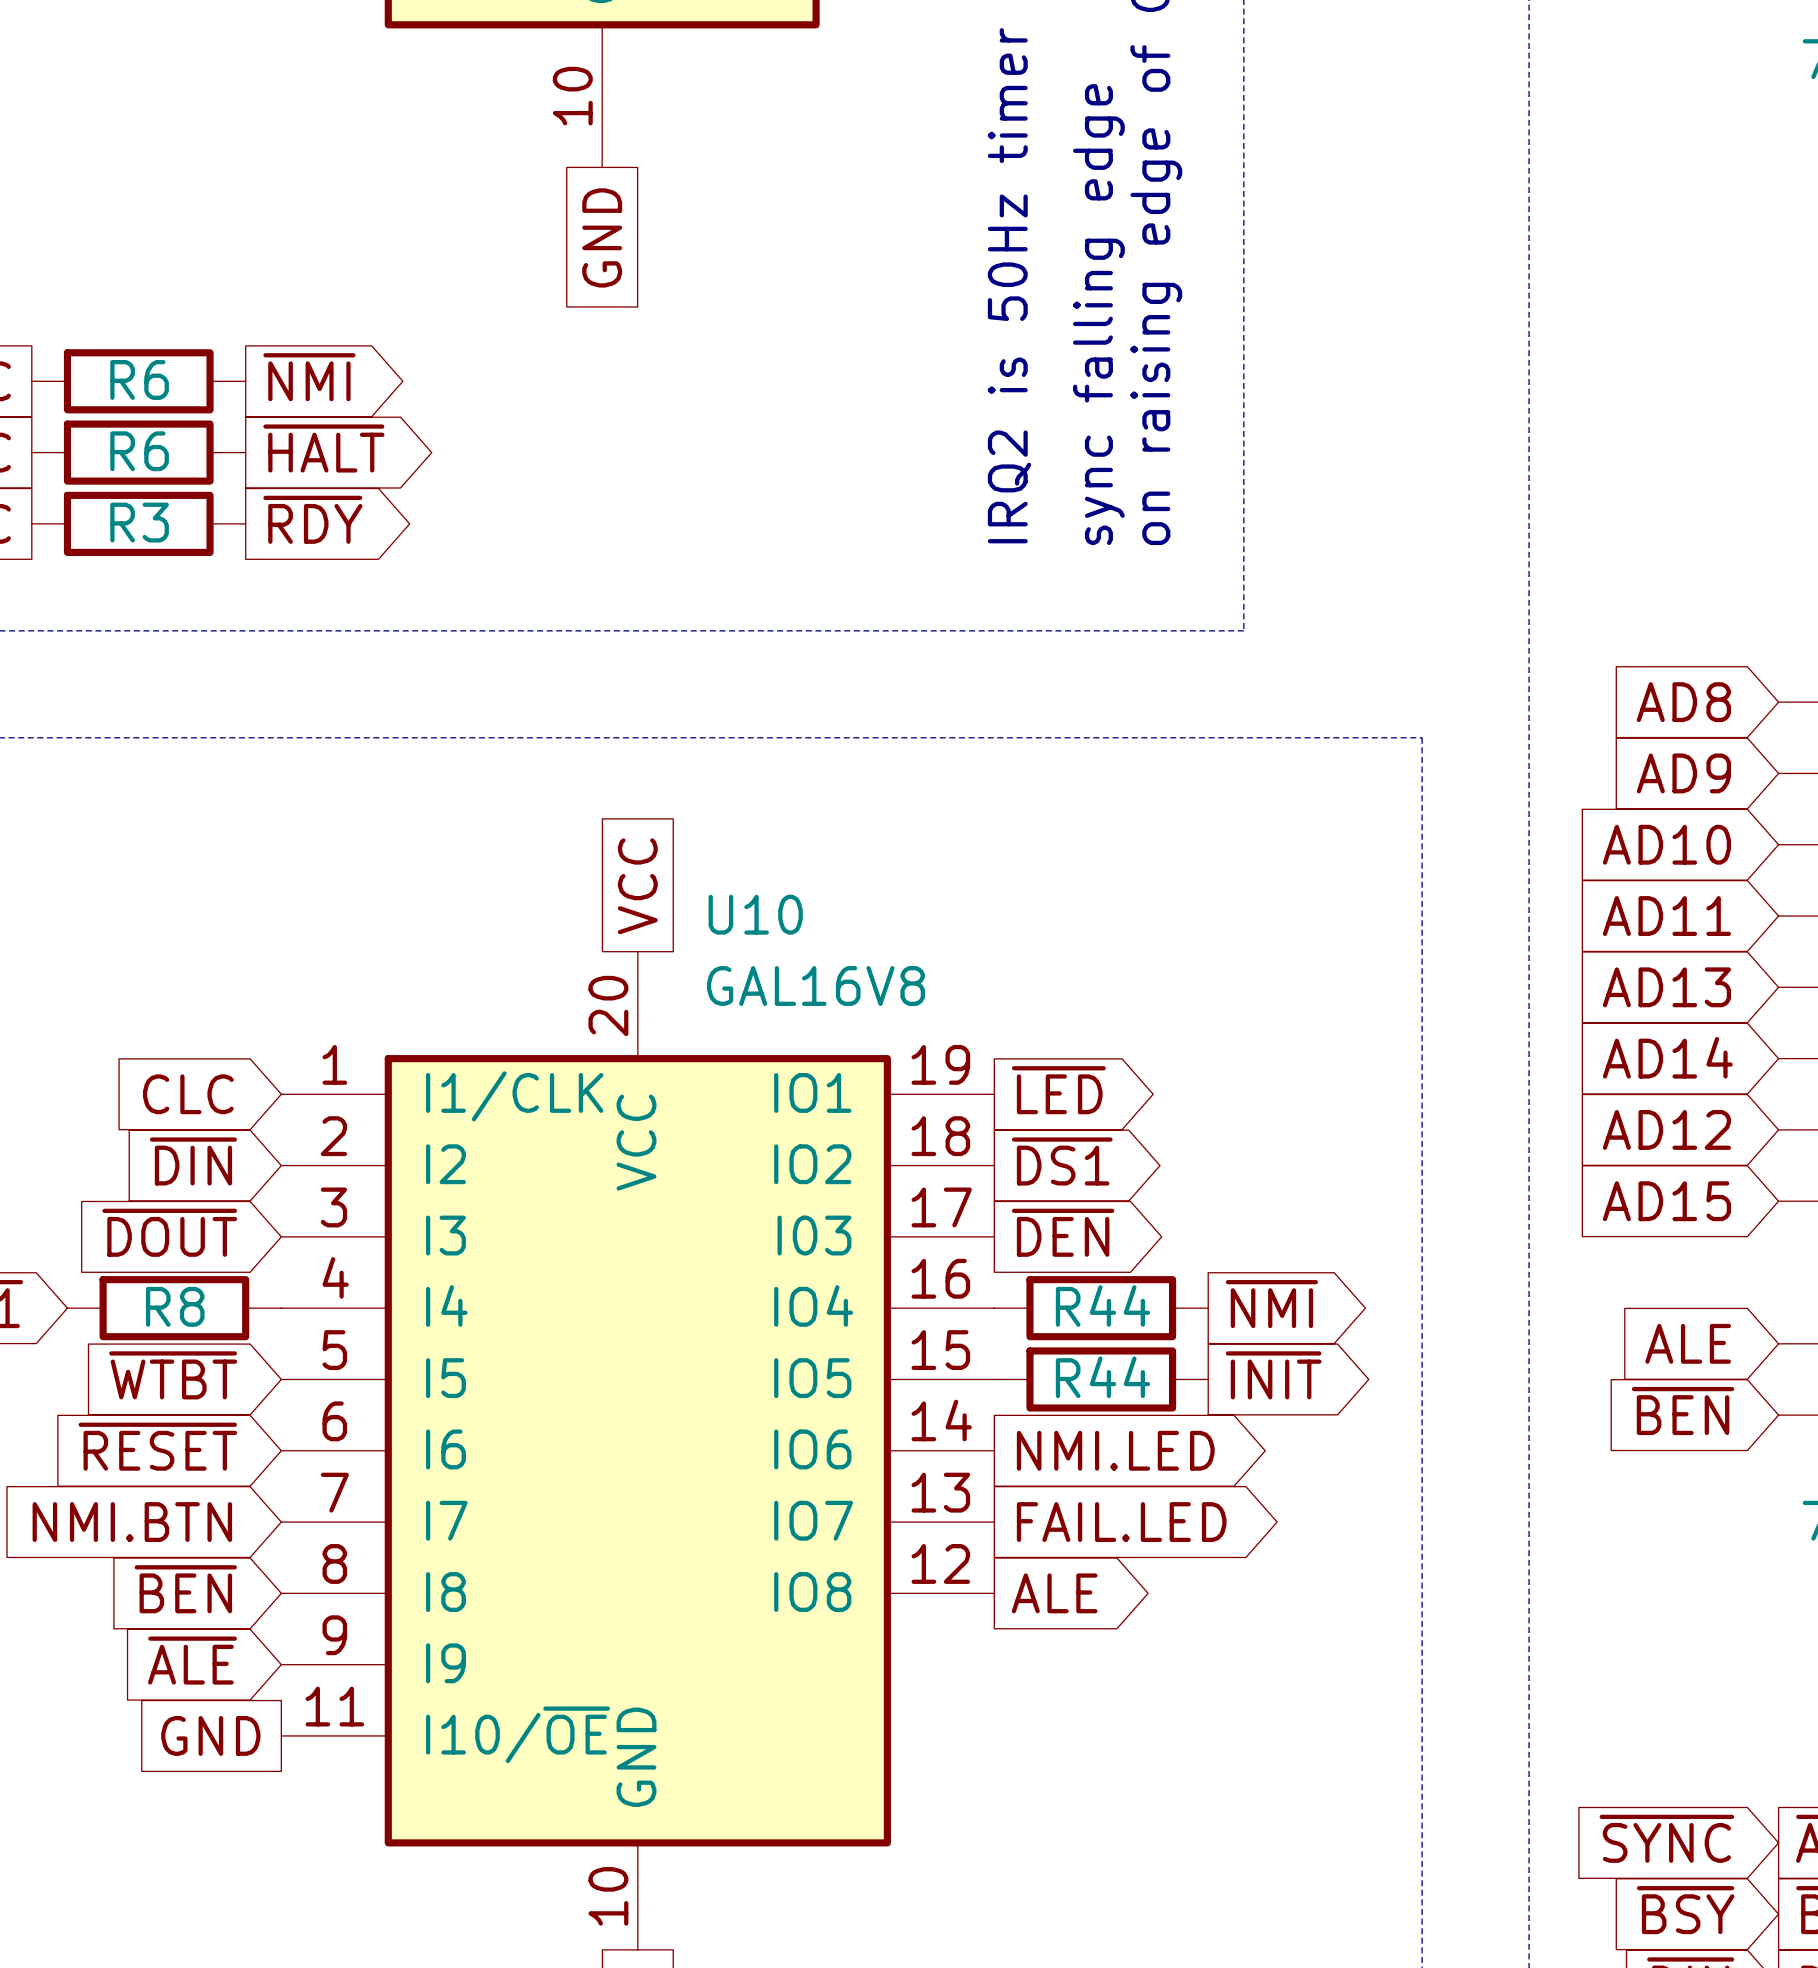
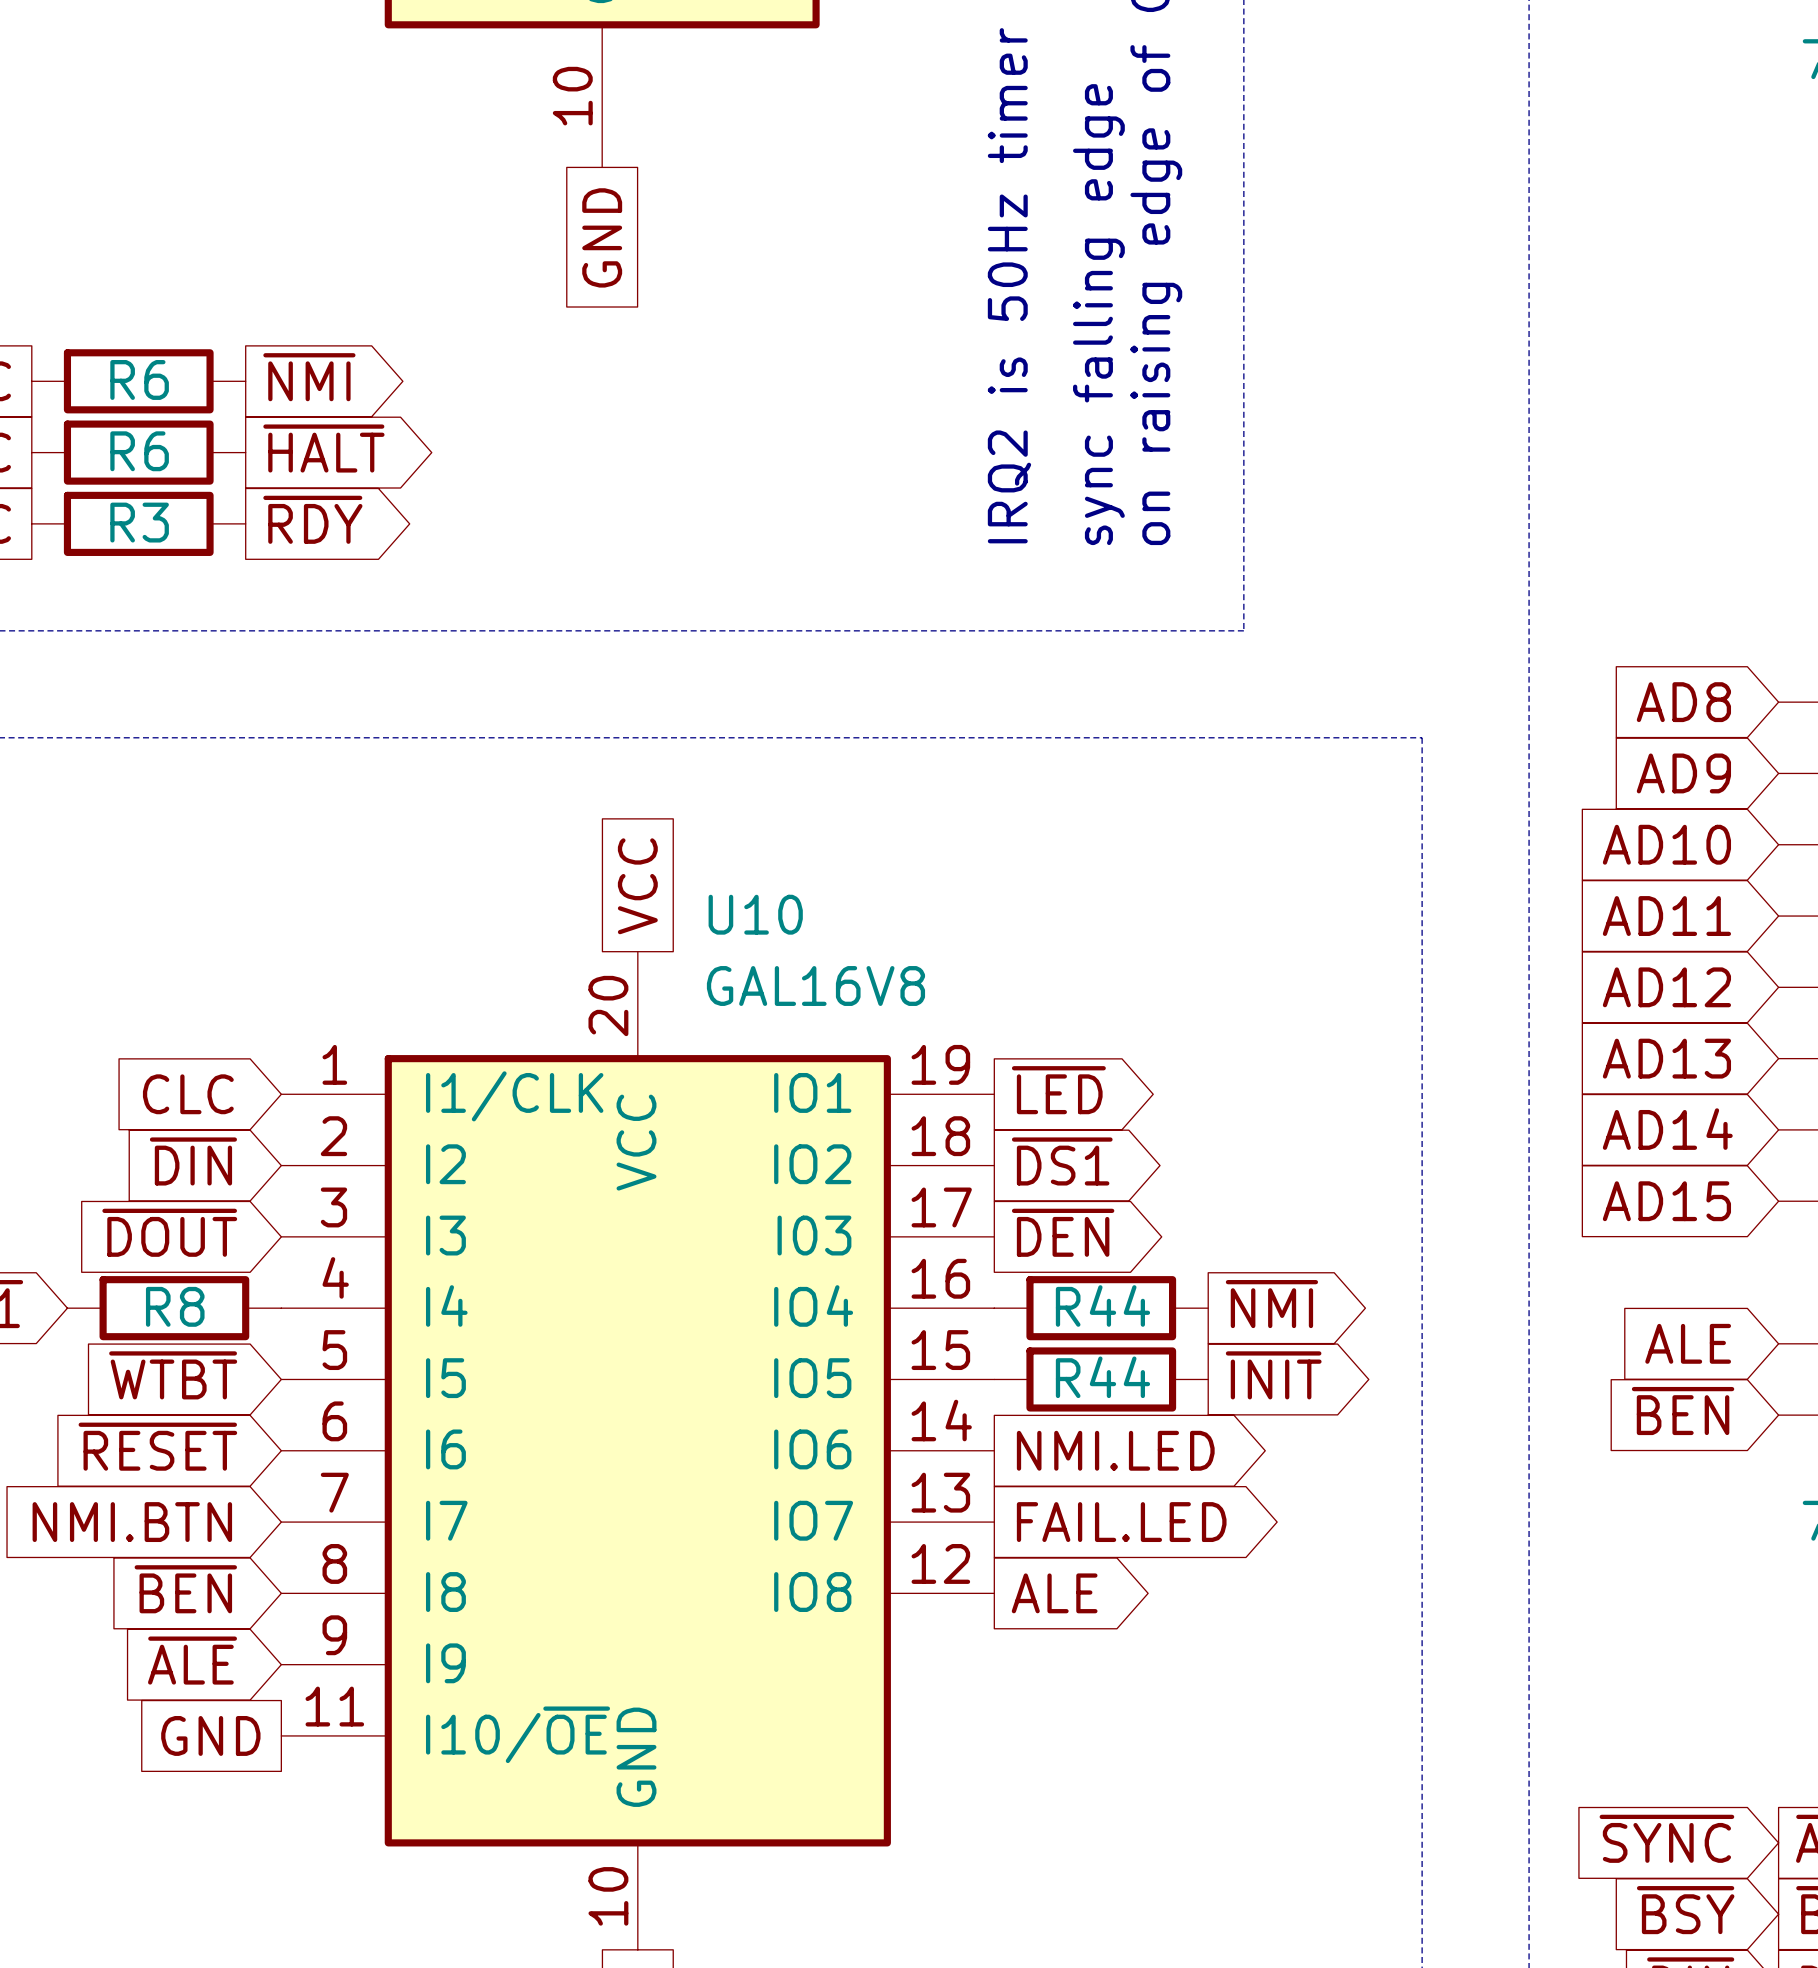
global label: AD13 (1666, 987) -> AD12 (1666, 987)
global label: AD14 (1667, 1057) -> AD13 (1666, 1058)
global label: AD12 (1666, 1129) -> AD14 (1667, 1129)

